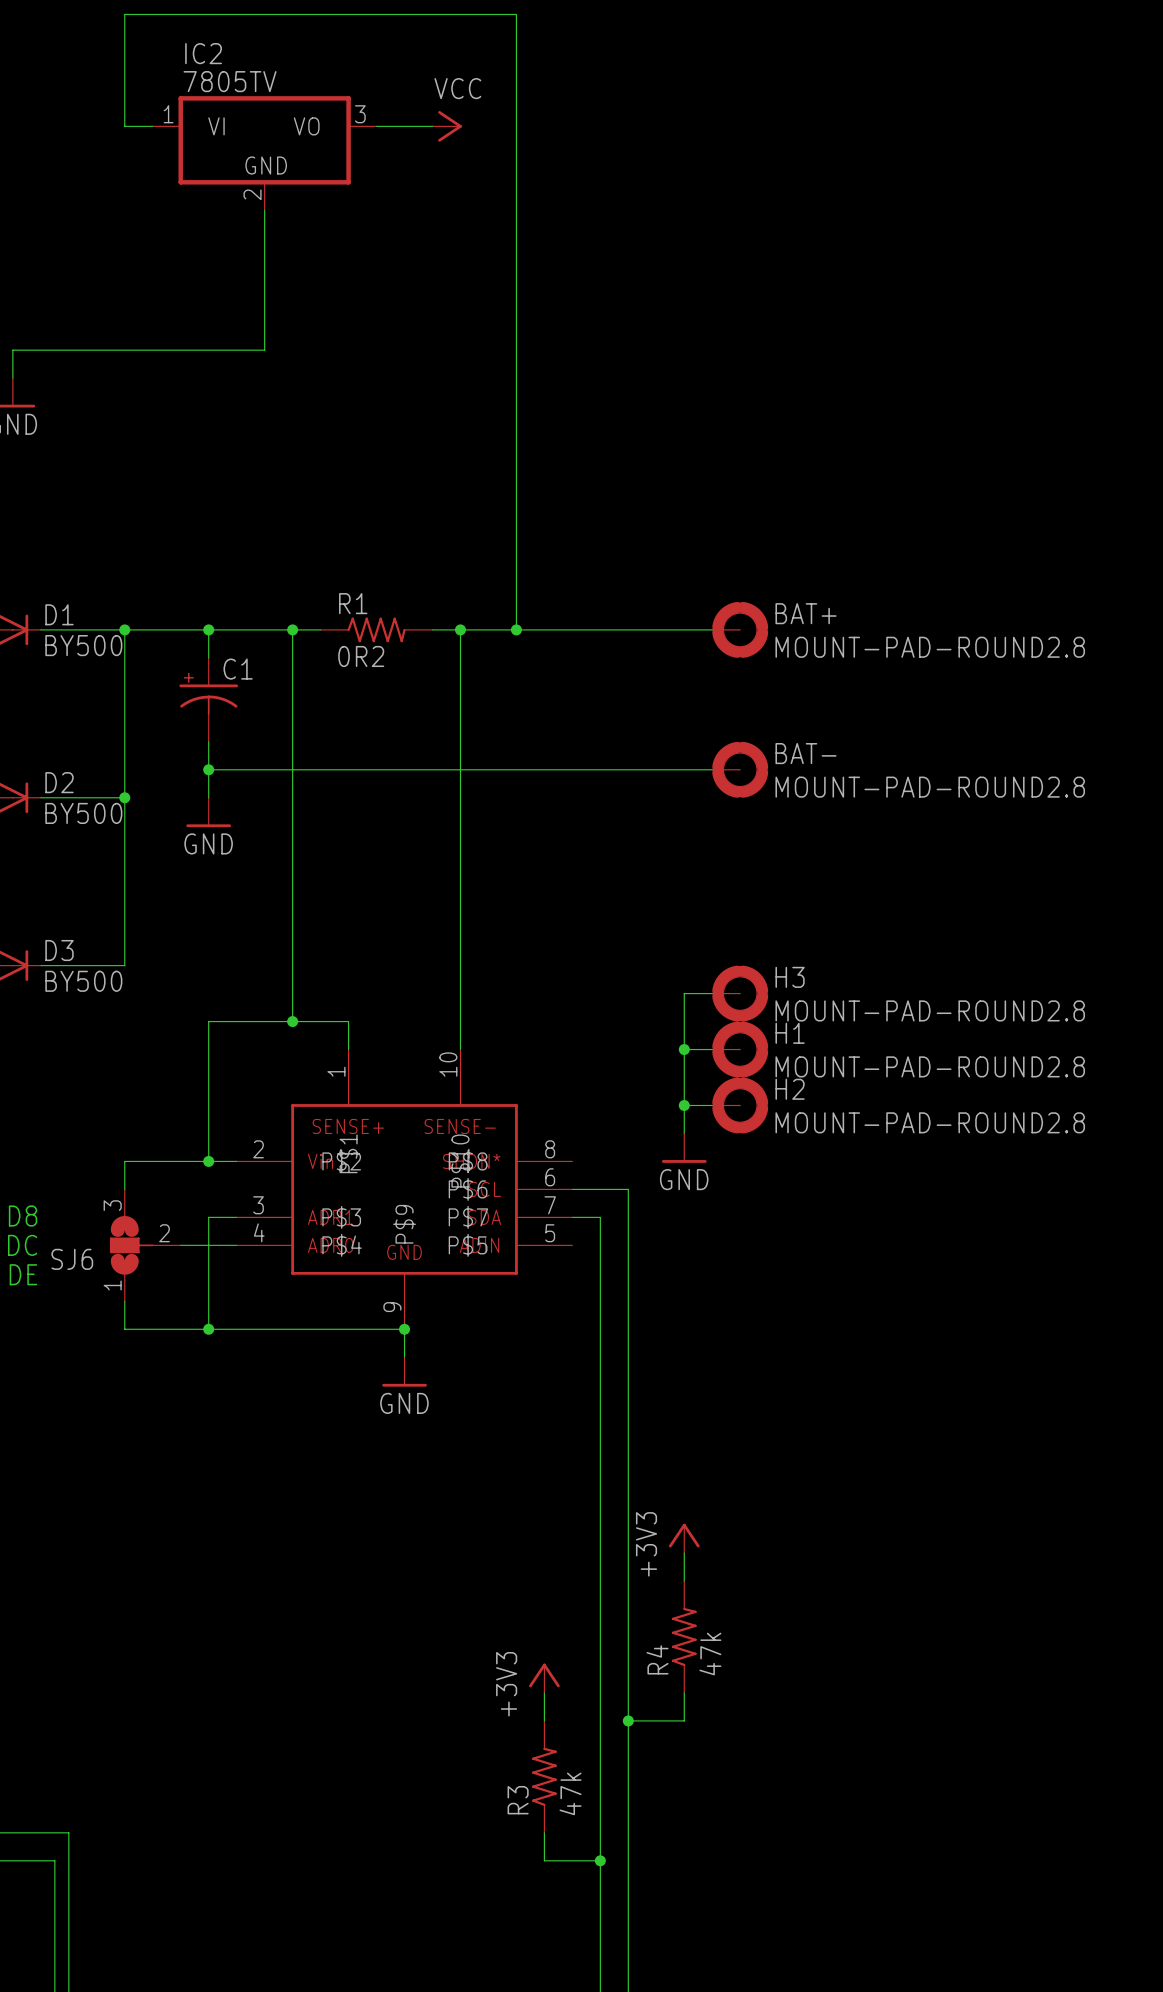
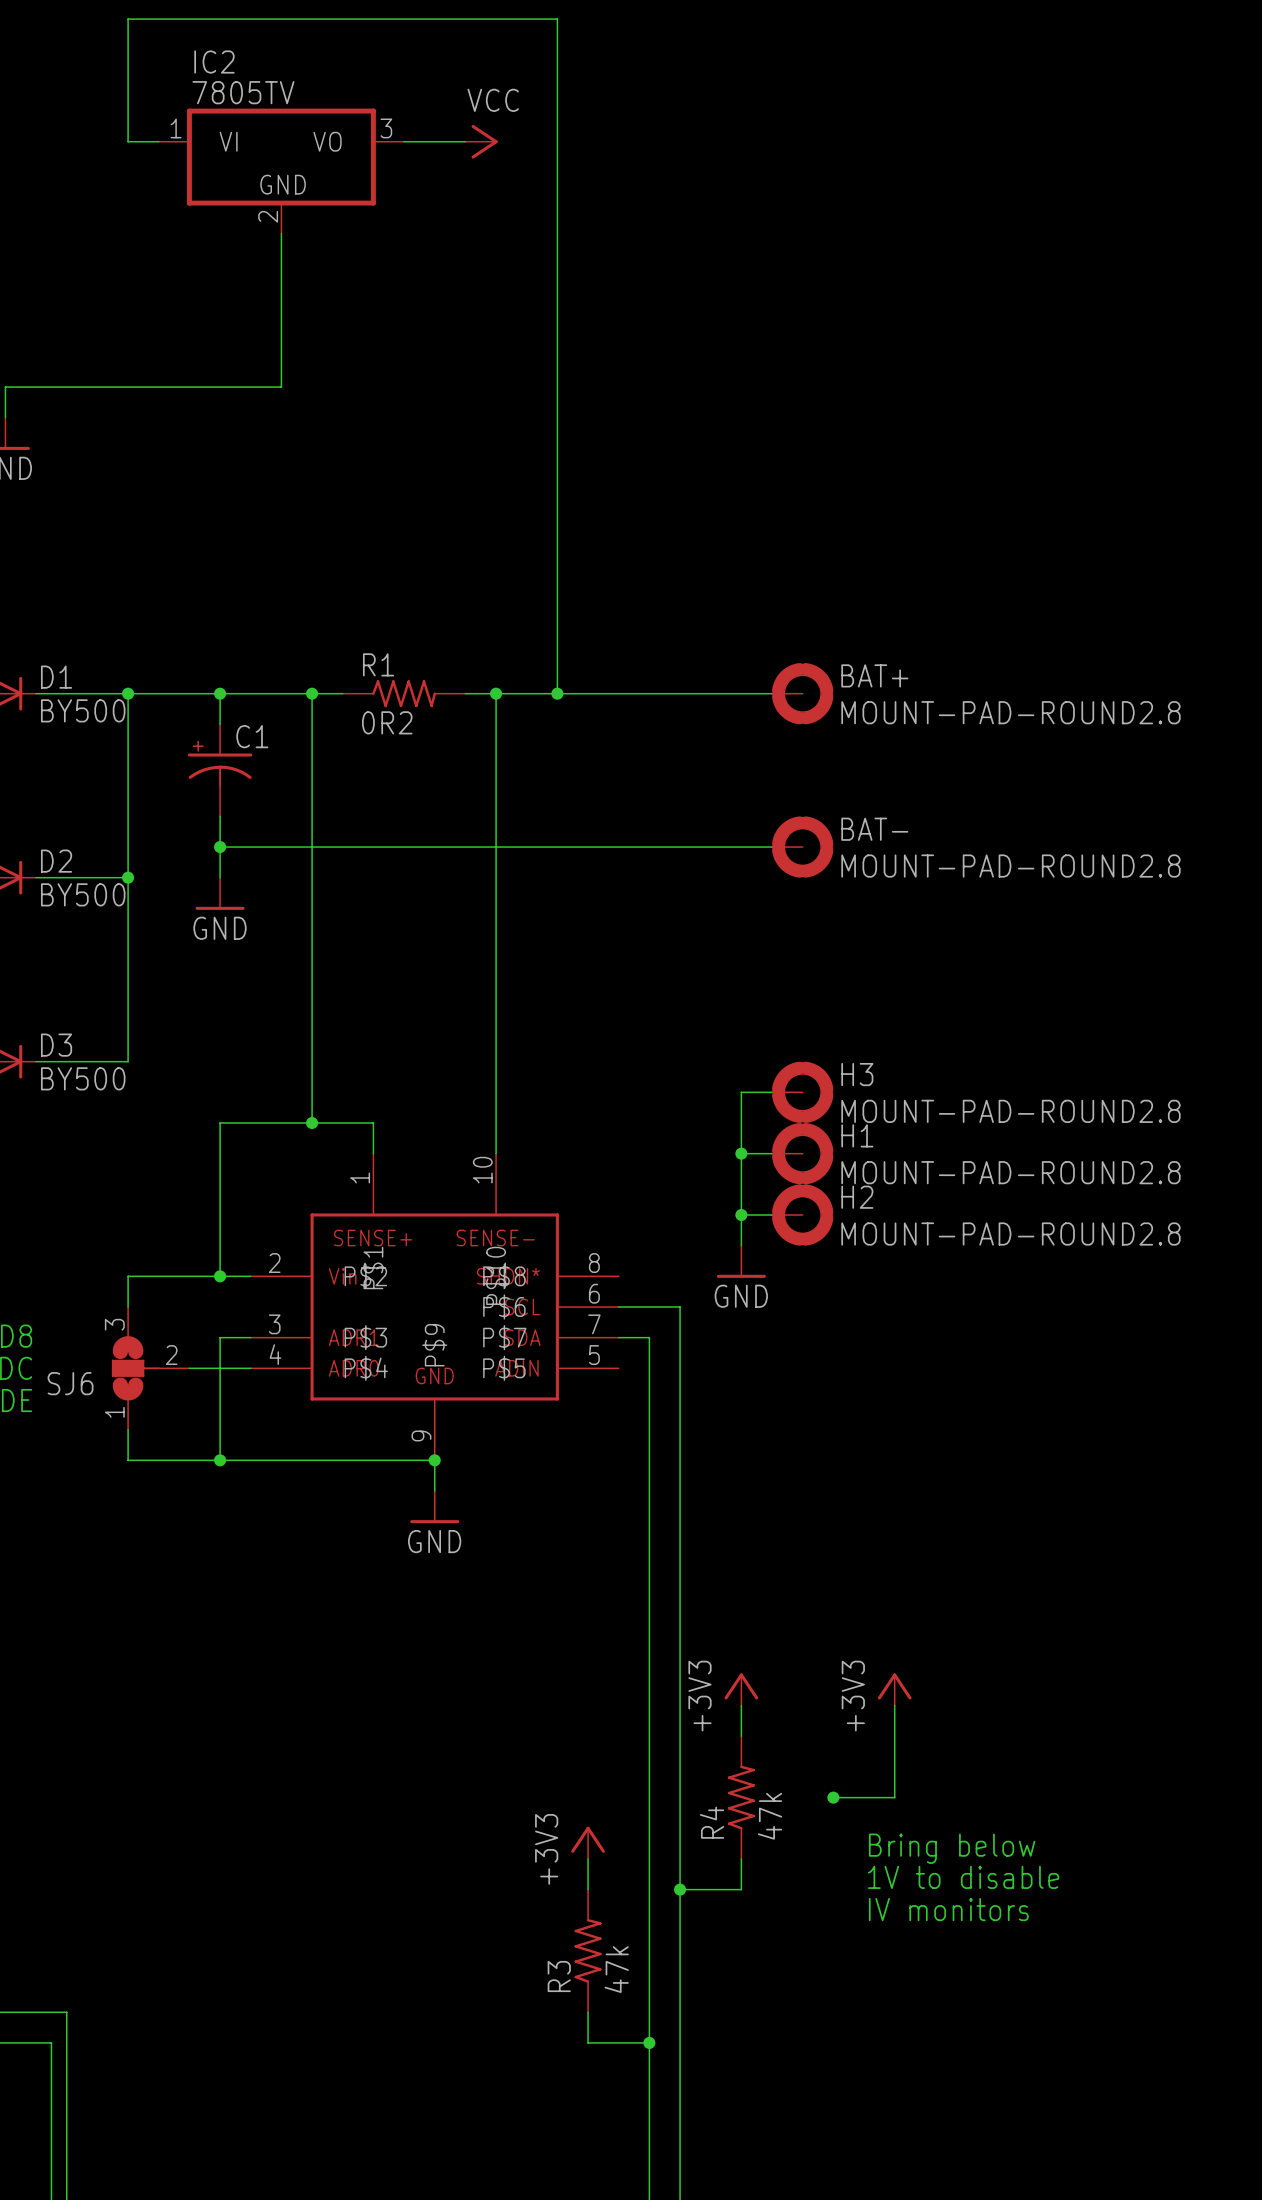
power symbol: none -> +3V3 (894, 1689)
wire: none -> (894, 1705) (894, 1797) (833, 1797)
junction: none -> (833, 1797)
text: none -> Bring below (952, 1848)
text: none -> 1V to disable (963, 1877)
text: none -> IV monitors (948, 1909)

